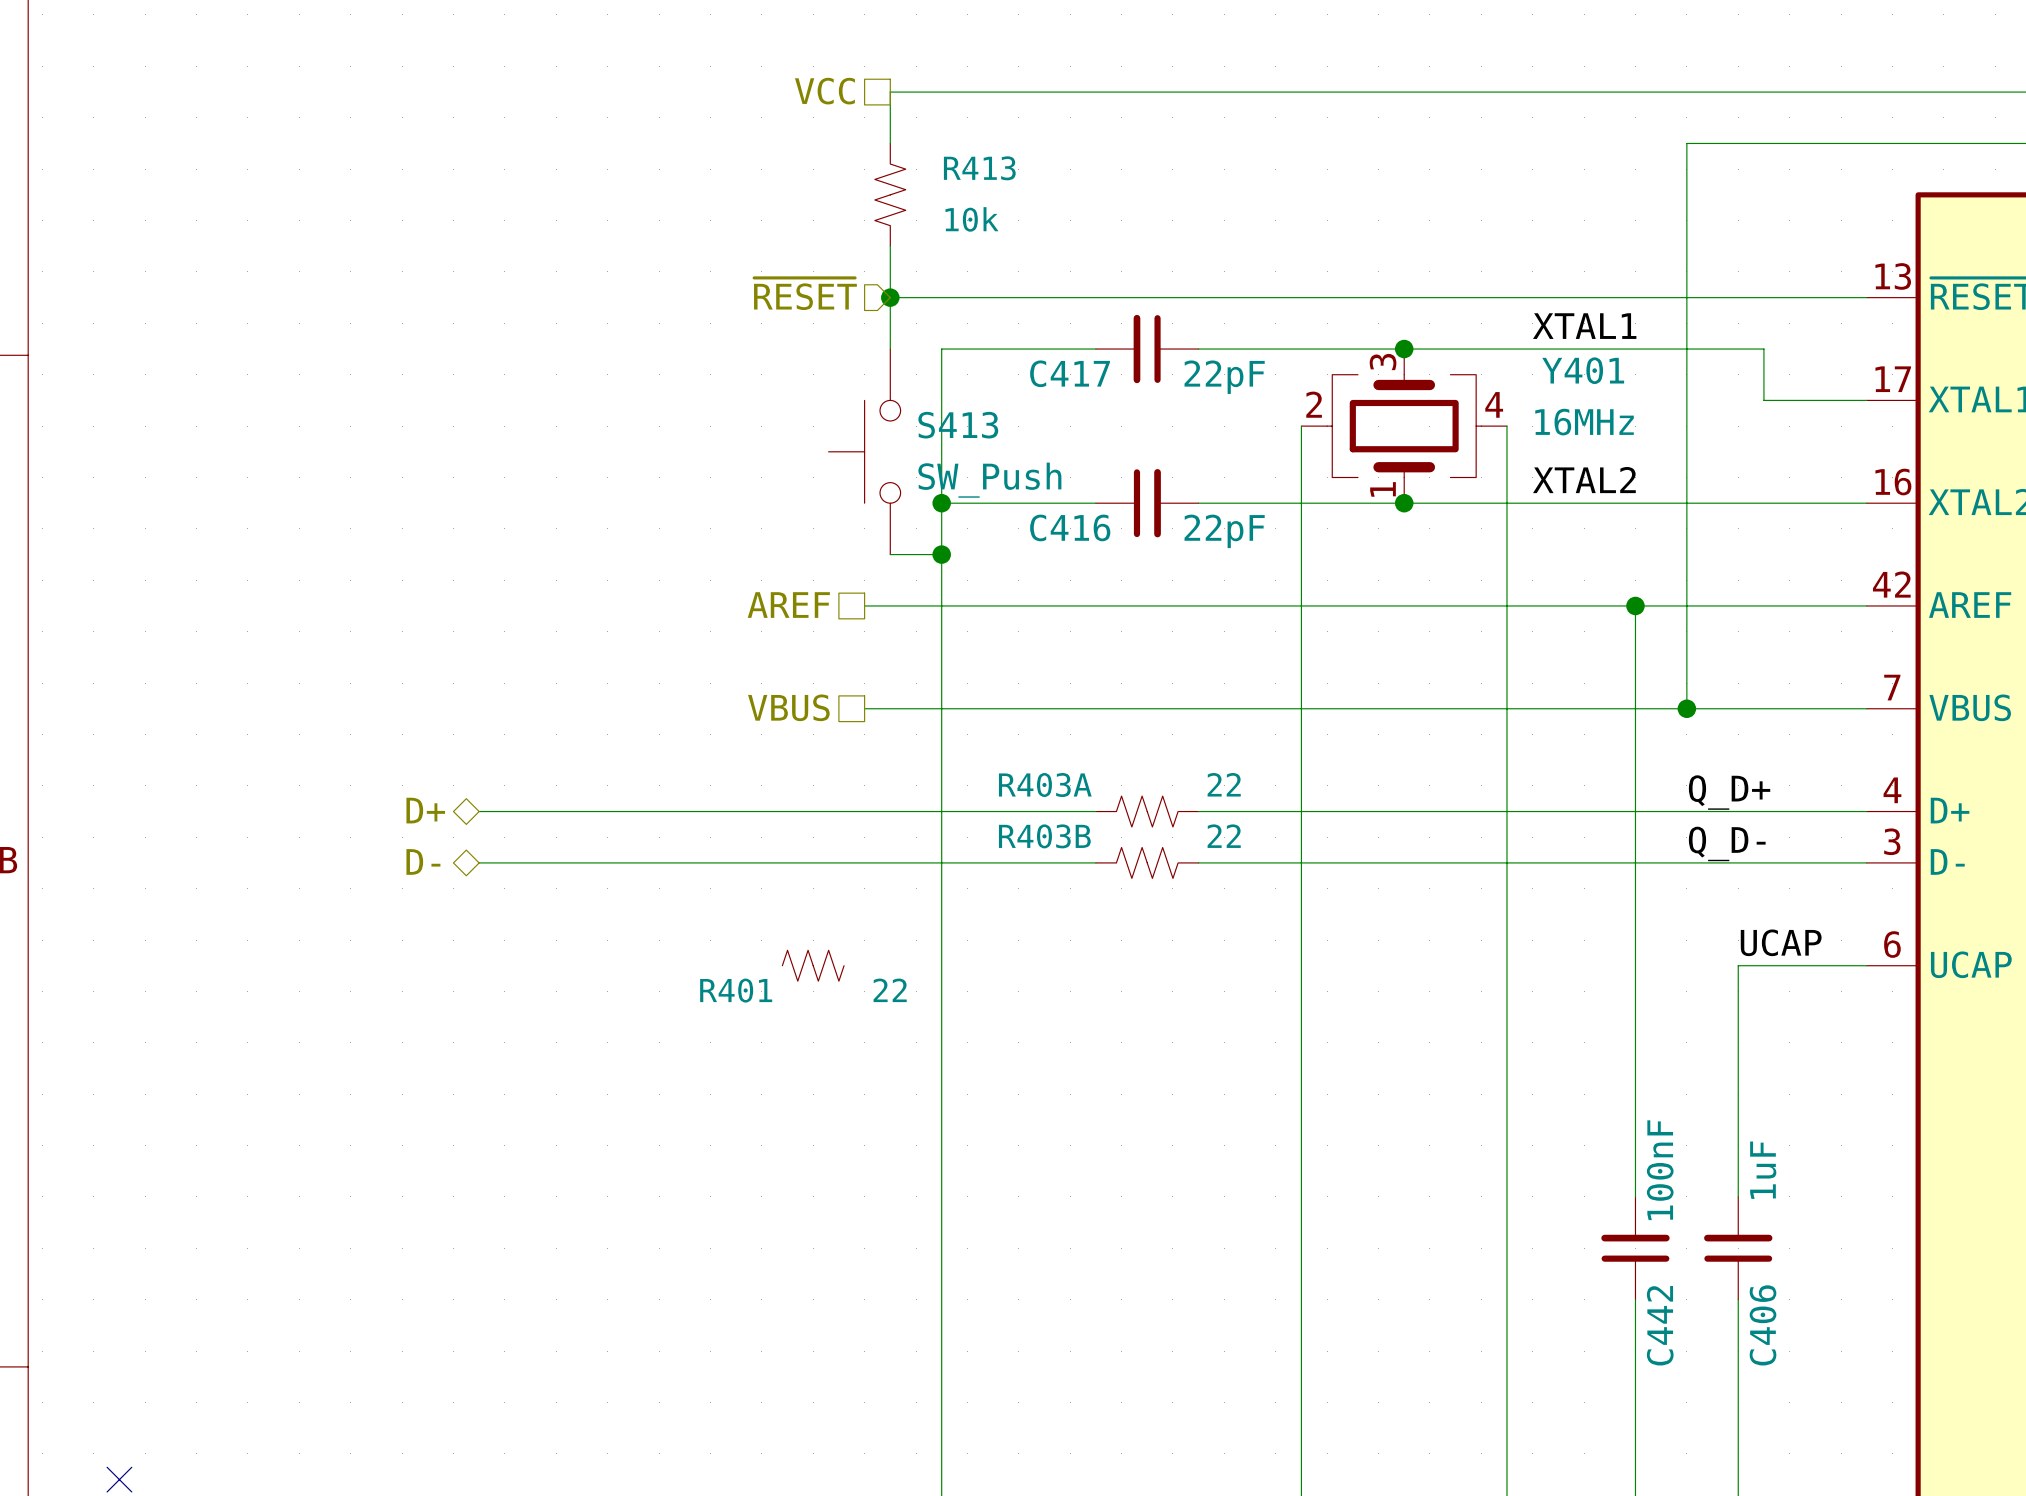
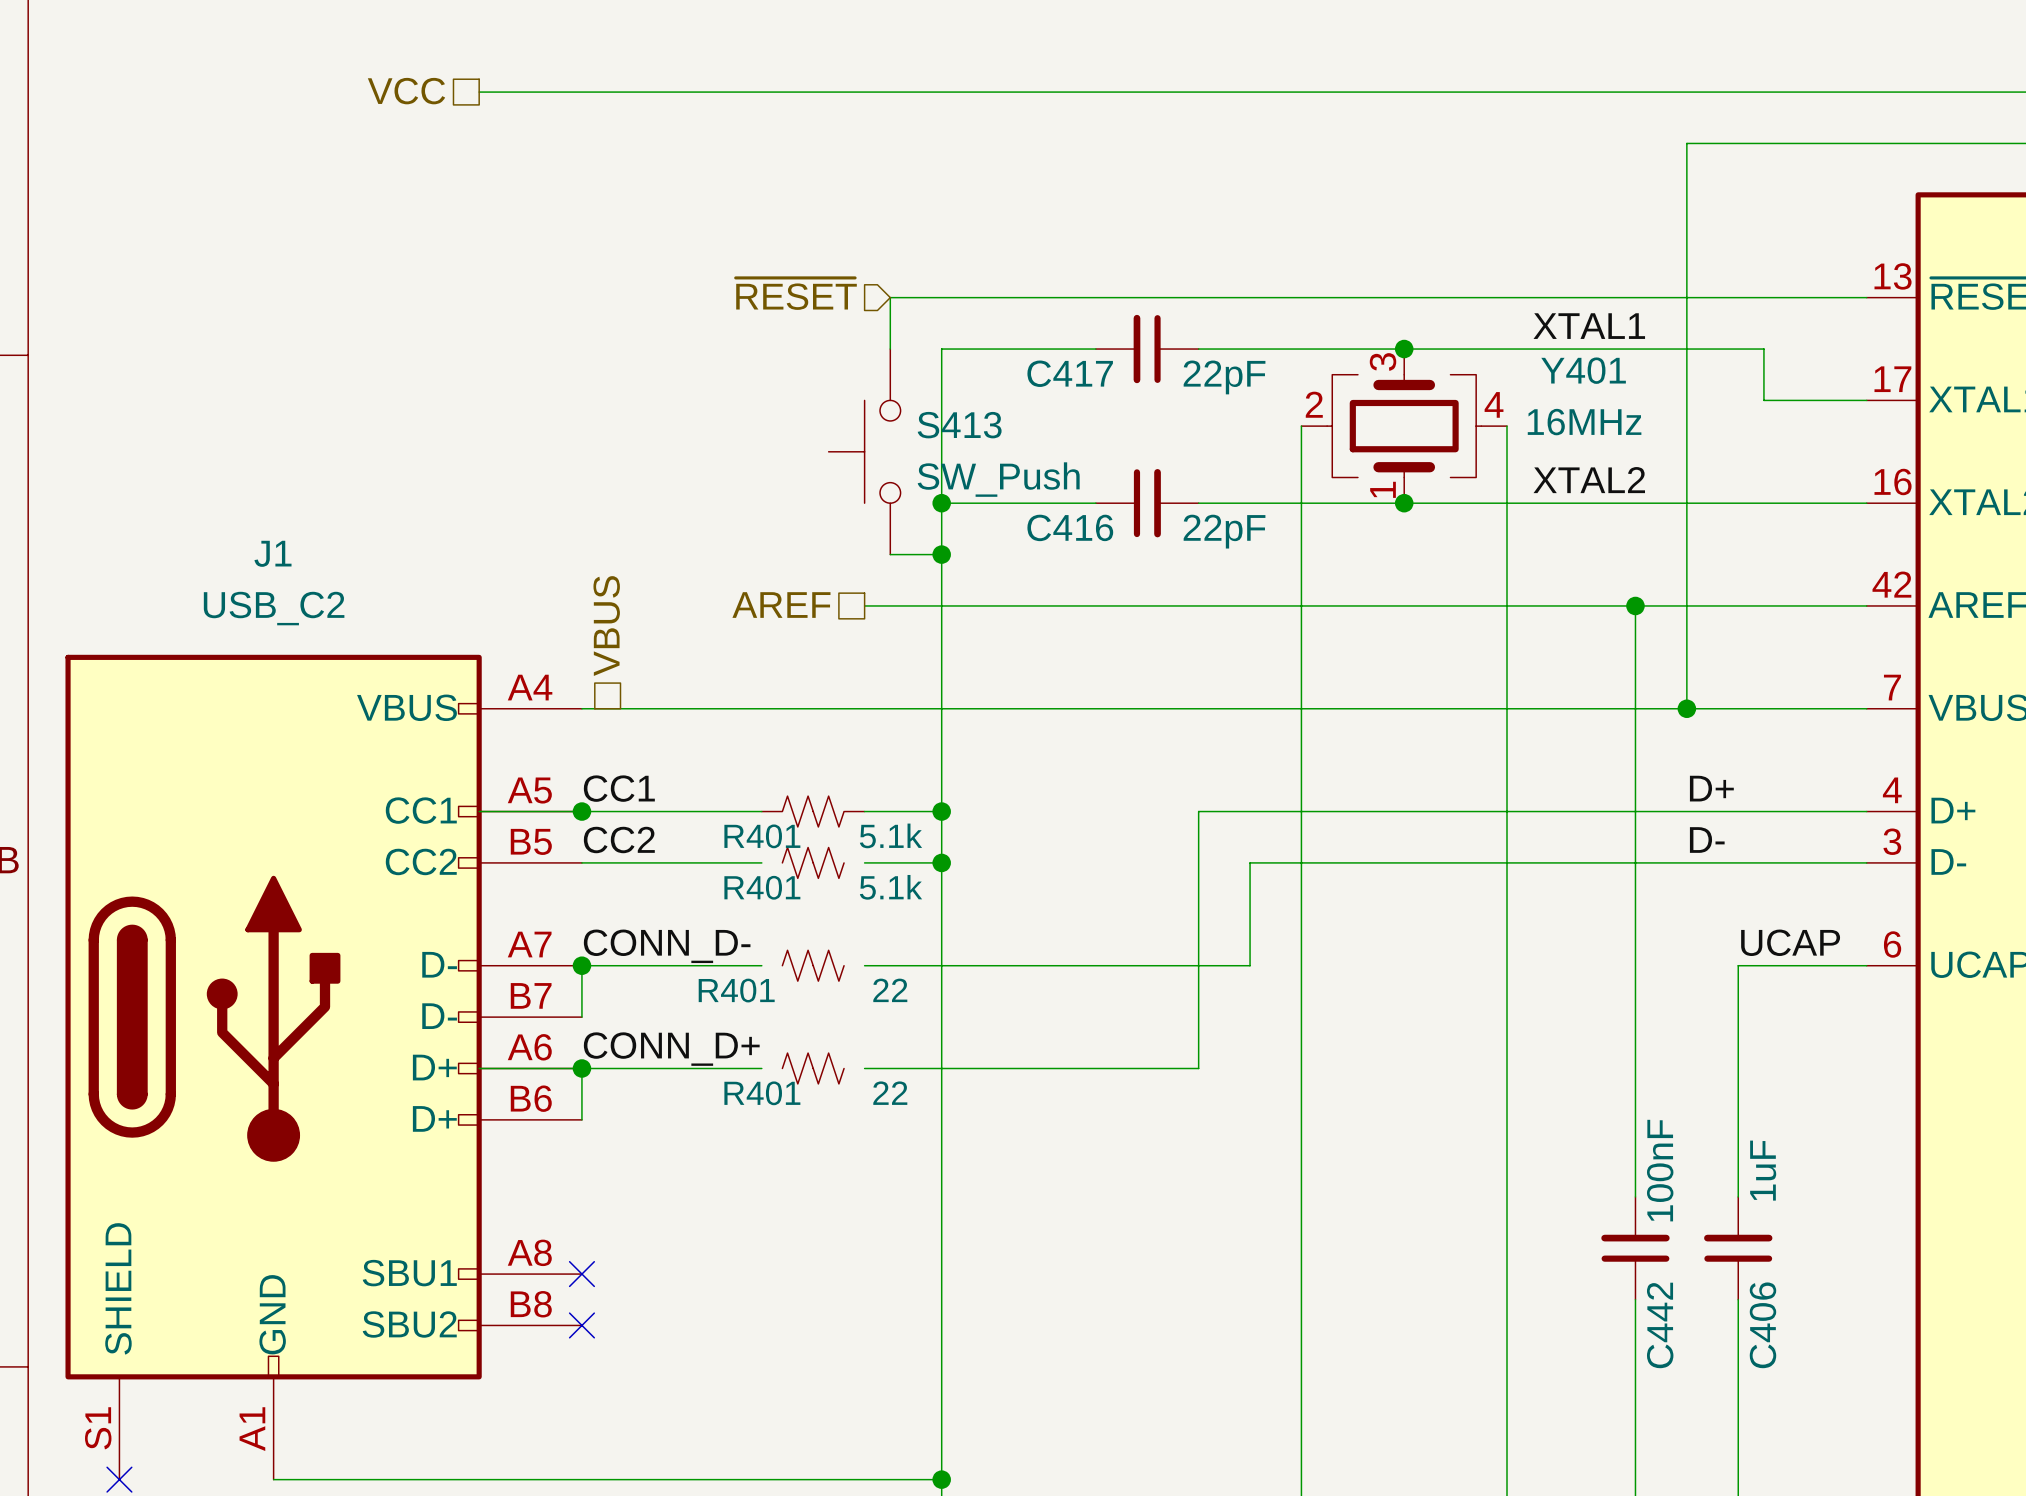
hierarchical label position: VCC (824, 91) -> VCC (406, 91)
wire: (890, 92) (890, 143) -> (890, 92) (479, 92)
R413: 10k (890, 194) -> none
wire: (890, 246) (890, 297) -> none
junction: (890, 297) -> none
hierarchical label rotation: 0° (788, 707) -> 90° clockwise (606, 626)
hierarchical label position: VBUS (788, 707) -> VBUS (606, 626)
wire: none -> (581, 708) (864, 708)
label: none -> CC1 (619, 788)
label: Q_D+ (1729, 792) -> D+ (1711, 788)
hierarchical label: D+ (425, 810) -> none
junction: none -> (581, 811)
wire: (761, 811) (864, 811) -> none
R401: none -> 5.1k (813, 811)
wire: (941, 811) (1095, 811) -> none
junction: none -> (941, 811)
R403A: 22 (1147, 811) -> none
wire: none -> (1198, 811) (1198, 1068) (864, 1068)
label: none -> CC2 (619, 839)
label: Q_D- (1727, 843) -> D- (1707, 840)
hierarchical label: D- (423, 861) -> none
wire: (761, 862) (864, 862) -> none
R401: none -> 5.1k (813, 862)
wire: (941, 862) (1095, 862) -> none
junction: none -> (941, 862)
R403B: 22 (1147, 862) -> none
wire: (1198, 862) (1250, 862) -> (864, 965) (1250, 965) (1250, 862)
label: none -> CONN_D- (667, 946)
junction: none -> (581, 965)
wire: none -> (761, 965) (581, 965) (581, 1017)
label: none -> CONN_D+ (671, 1049)
J1: none -> USB_C2 (323, 1067)
wire: none -> (479, 1068) (761, 1068)
wire: none -> (581, 1068) (581, 1119)
junction: none -> (581, 1068)
R401: none -> 22 (813, 1068)
no-connect mark: none -> (581, 1274)
no-connect mark: none -> (581, 1325)
wire: none -> (273, 1479) (941, 1479)
junction: none -> (941, 1479)

